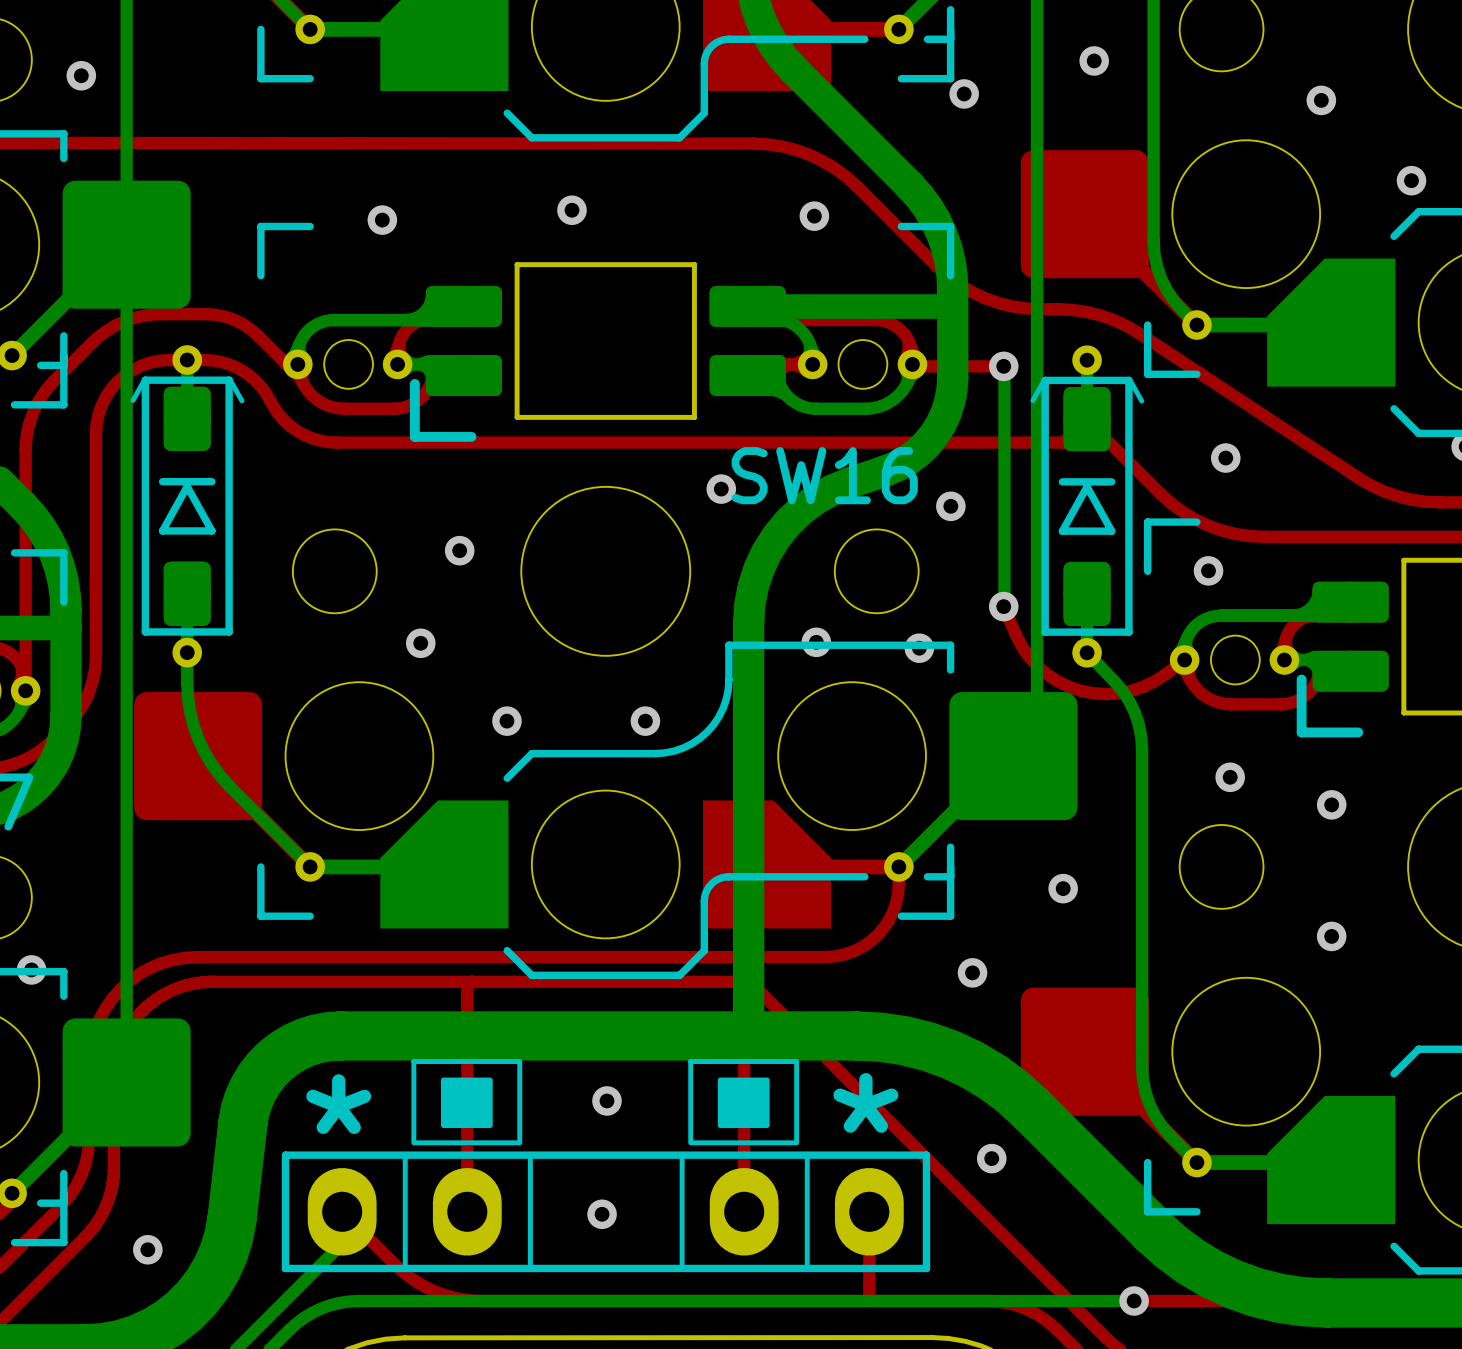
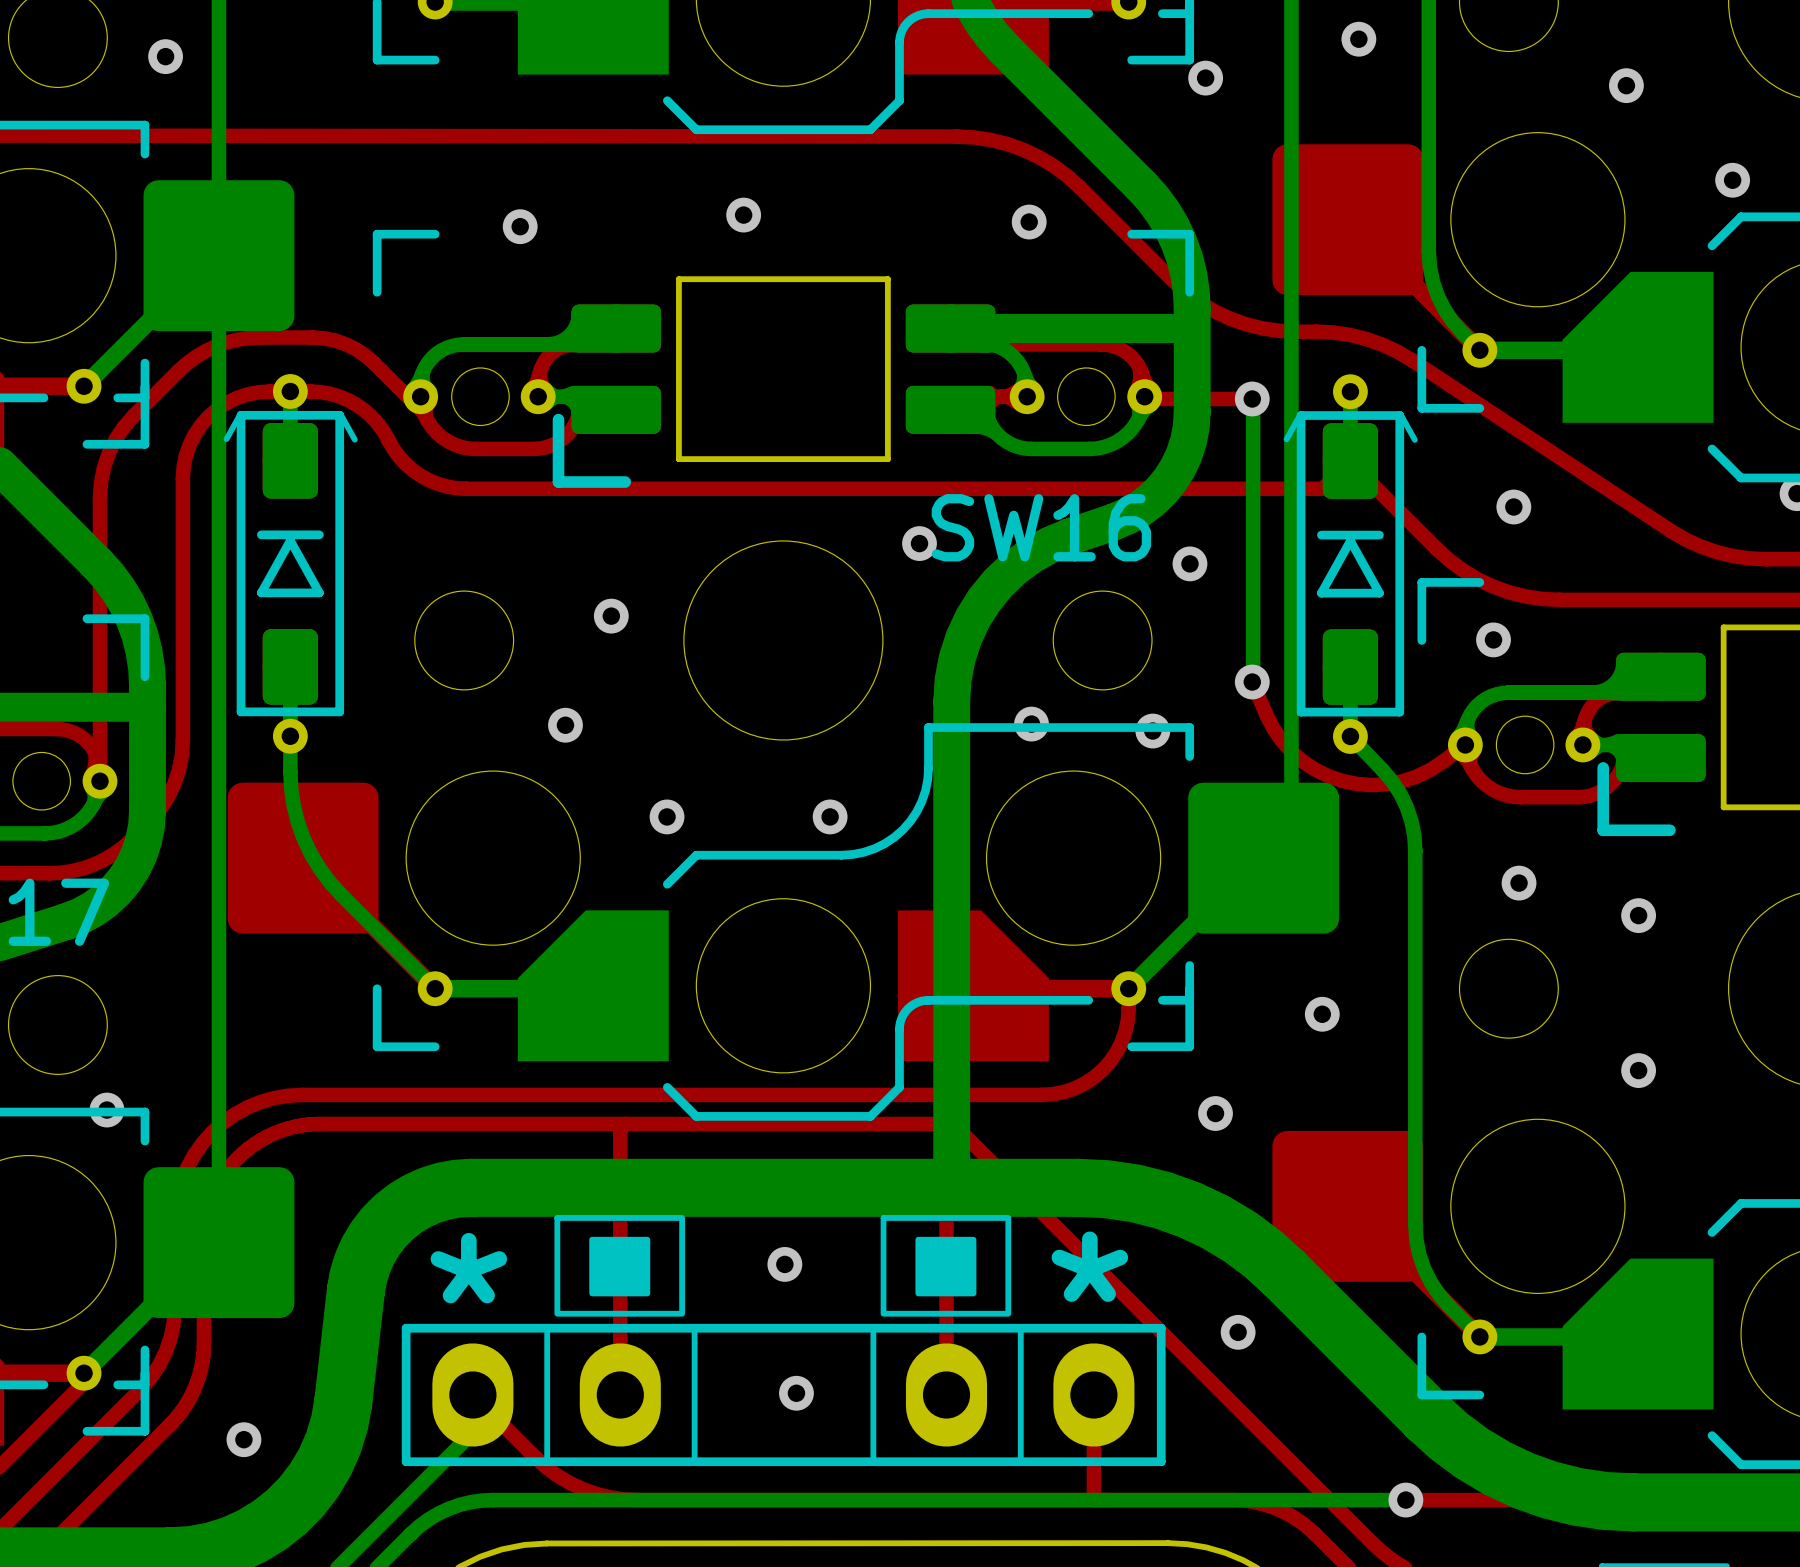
via position: (602, 1214) -> (796, 1393)

